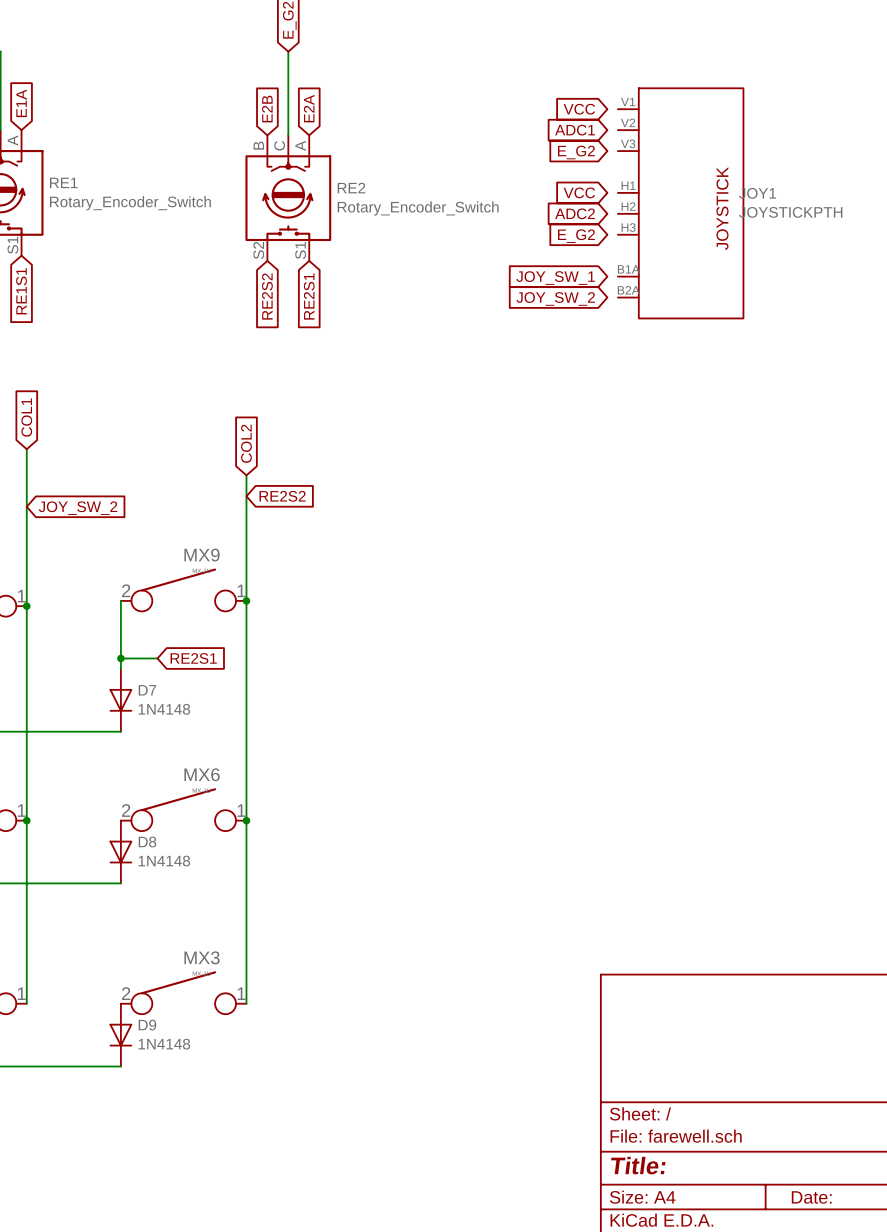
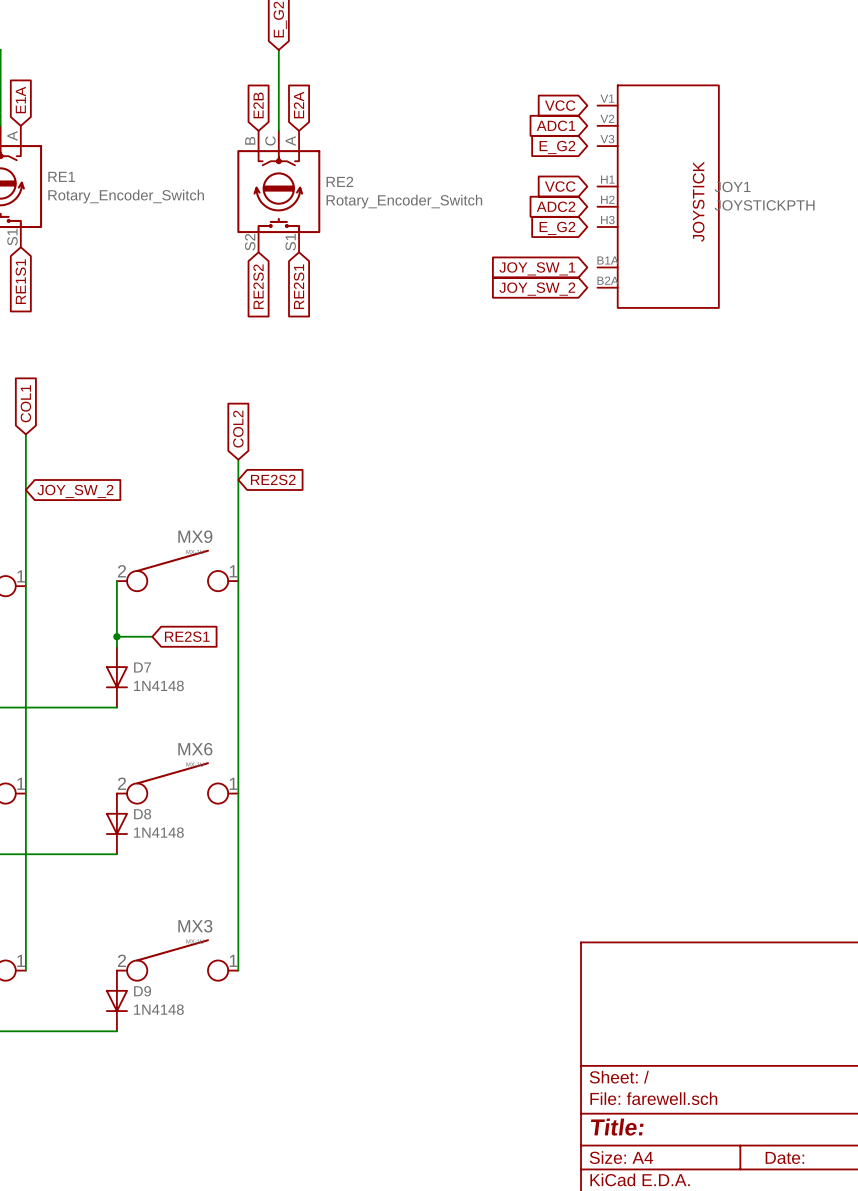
junction: (246, 600) -> none
junction: (26, 606) -> none
junction: (26, 820) -> none
junction: (246, 820) -> none

